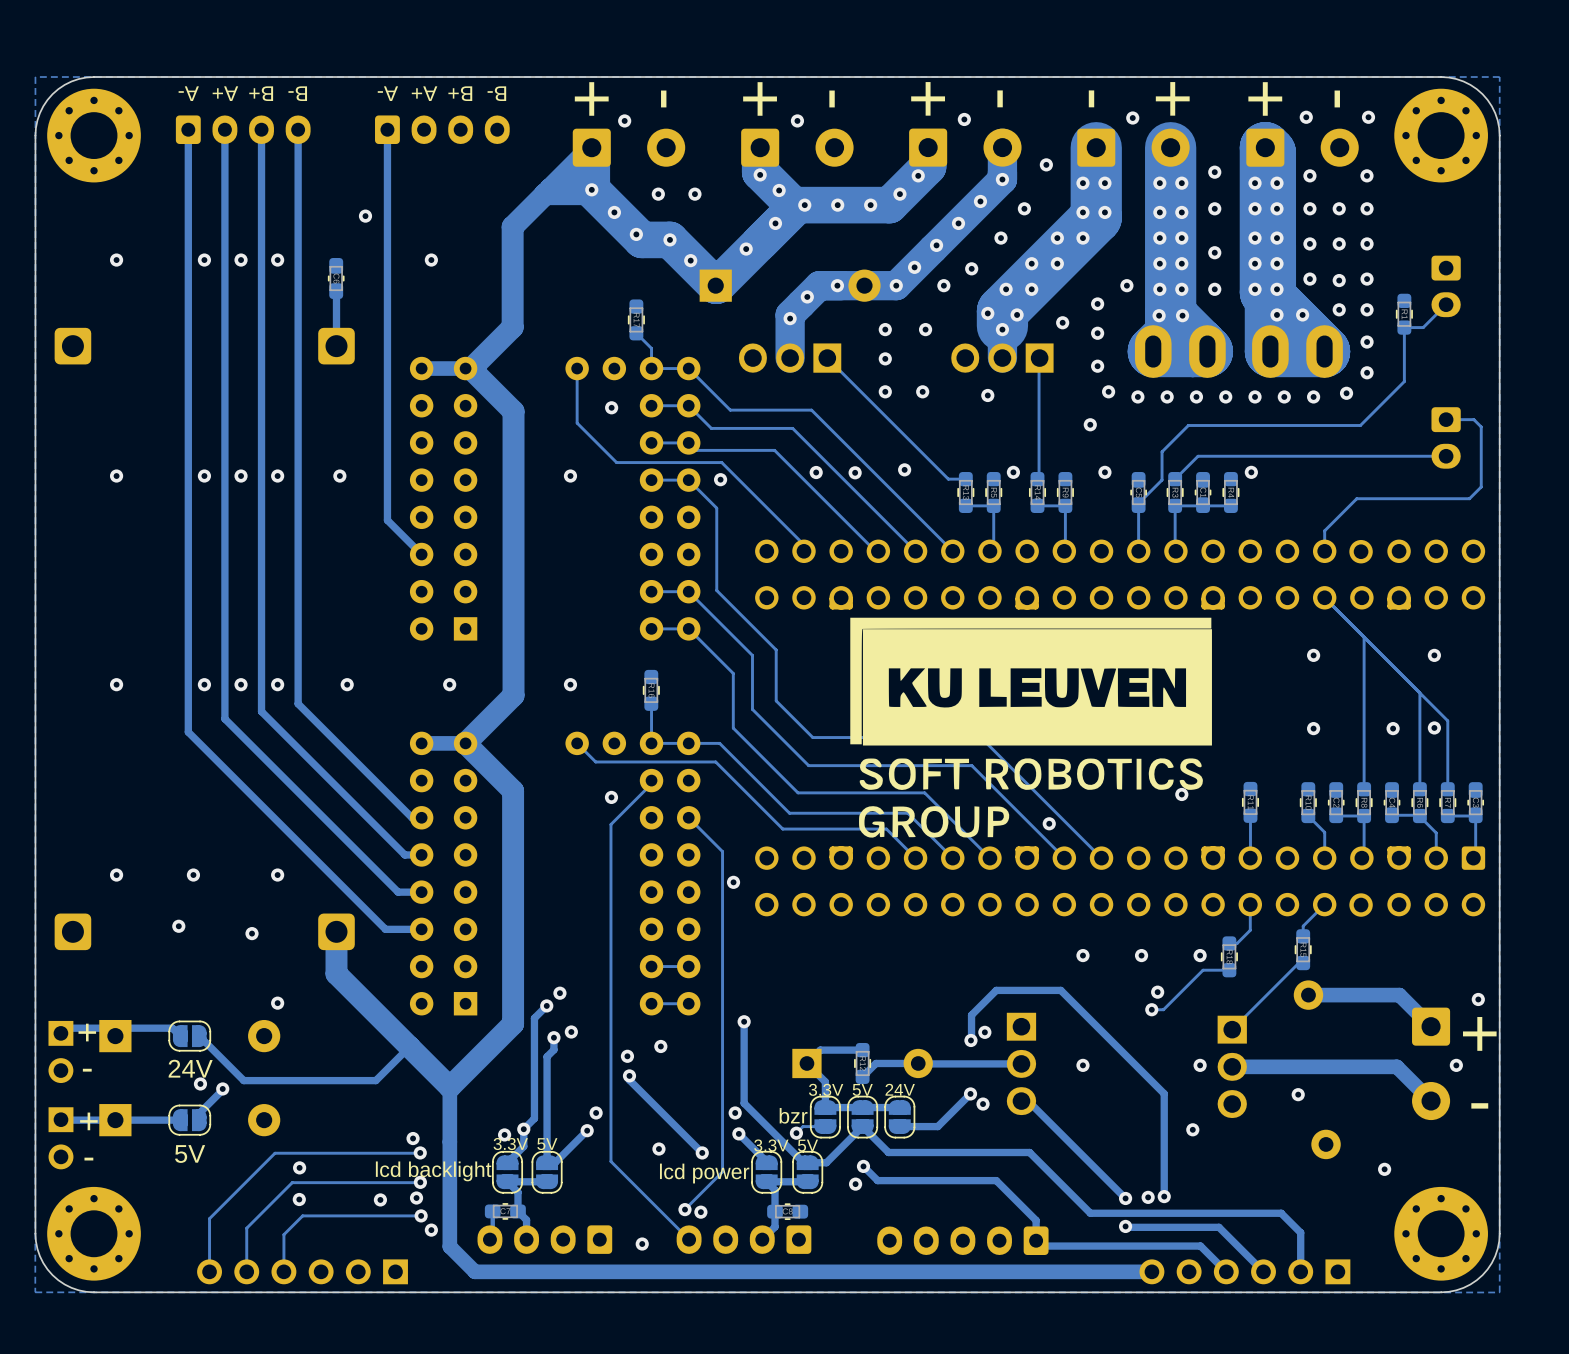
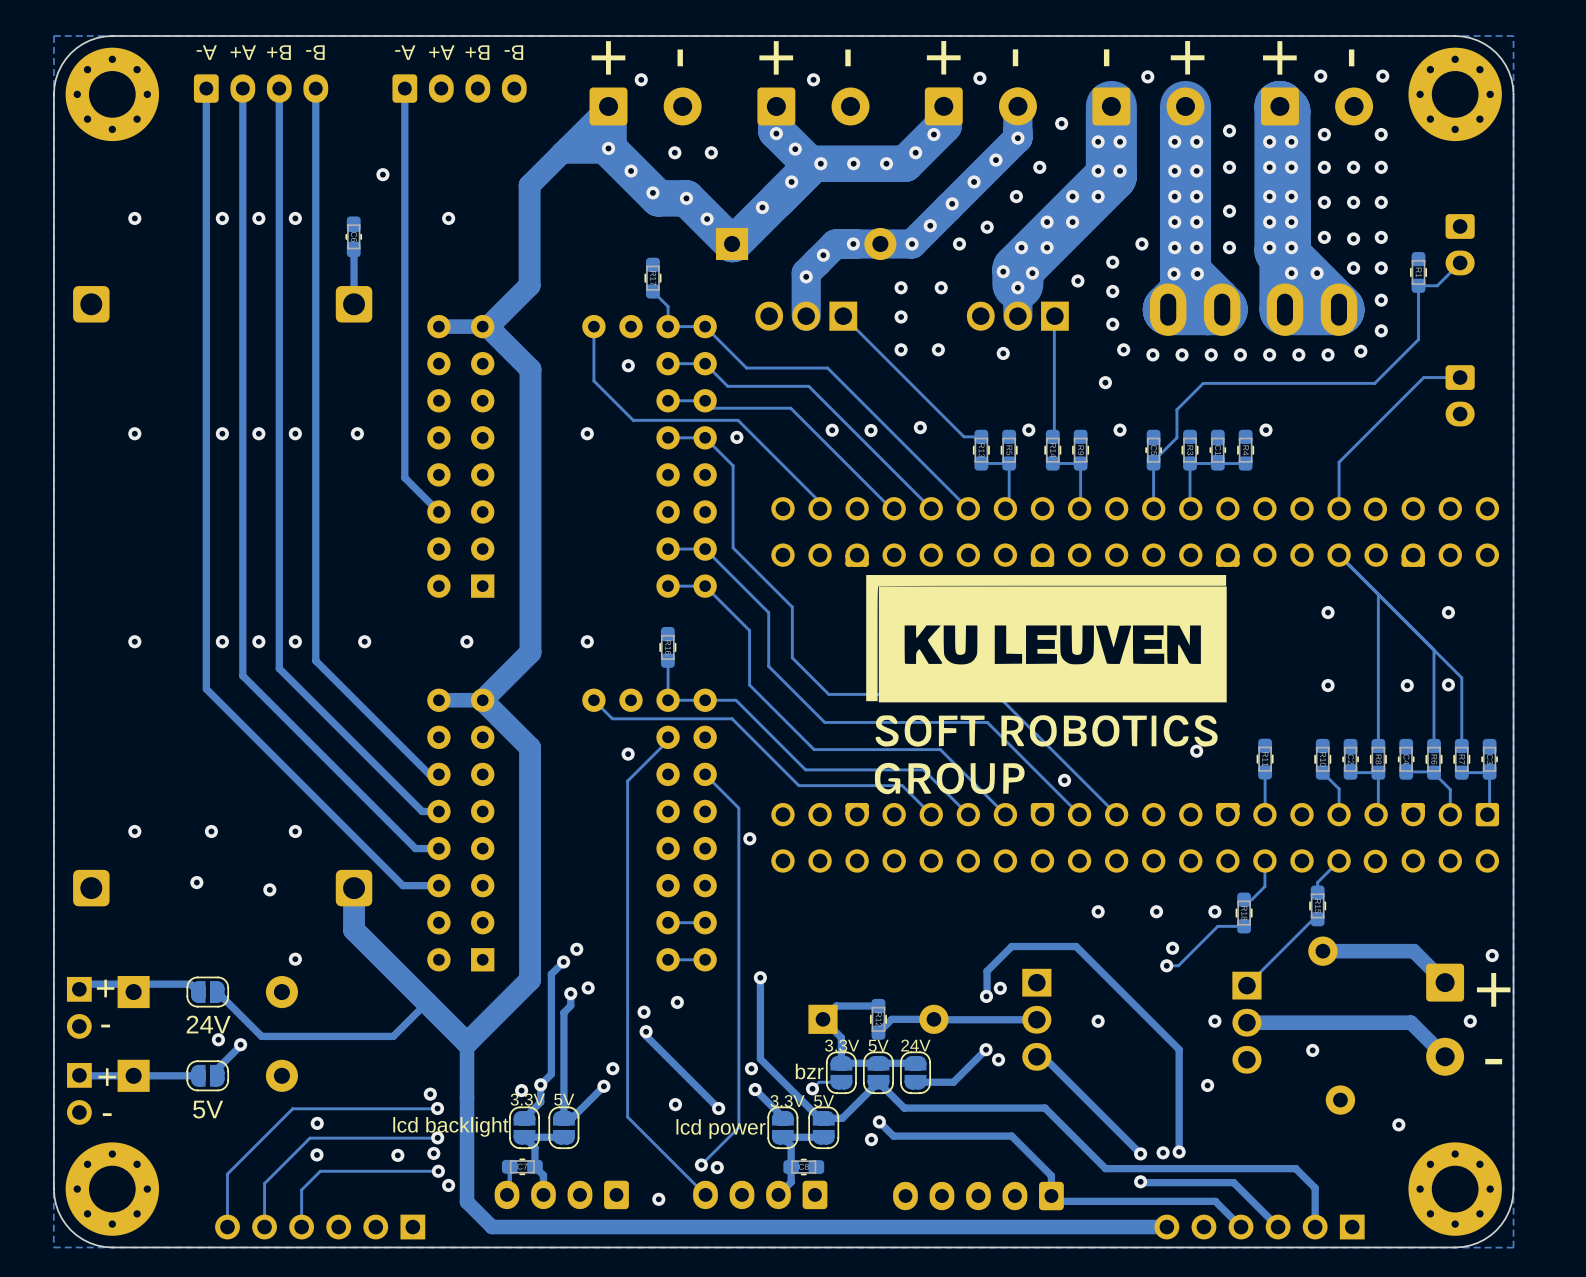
track: (1446, 419) (1473, 419) (1481, 426) (1481, 487) (1469, 498) (1356, 498) (1324, 530) -> (1460, 377) (1423, 377) (1339, 462) (1339, 488)
track: (1446, 456) (1198, 456) (1175, 479) -> none

